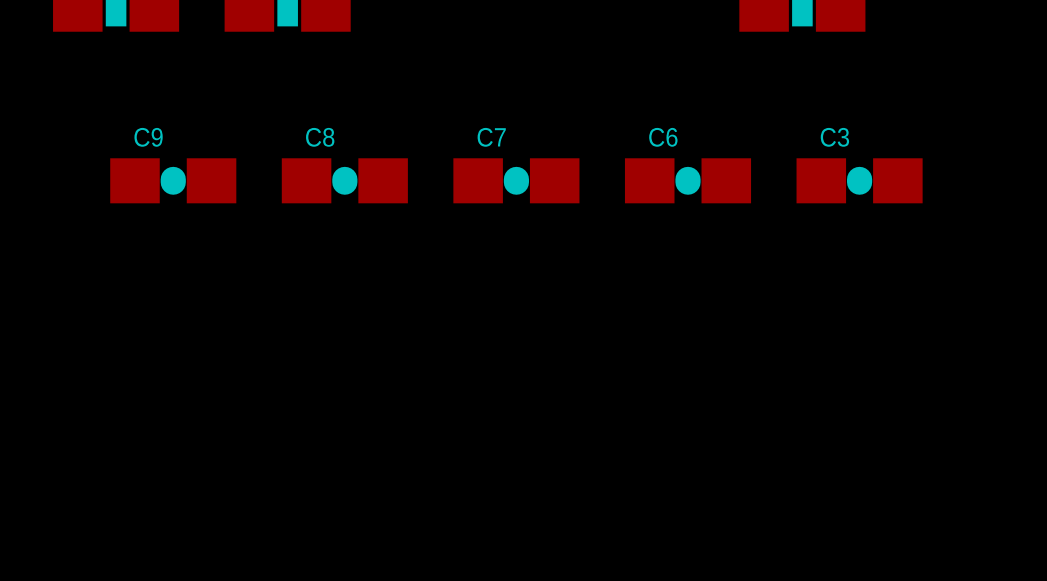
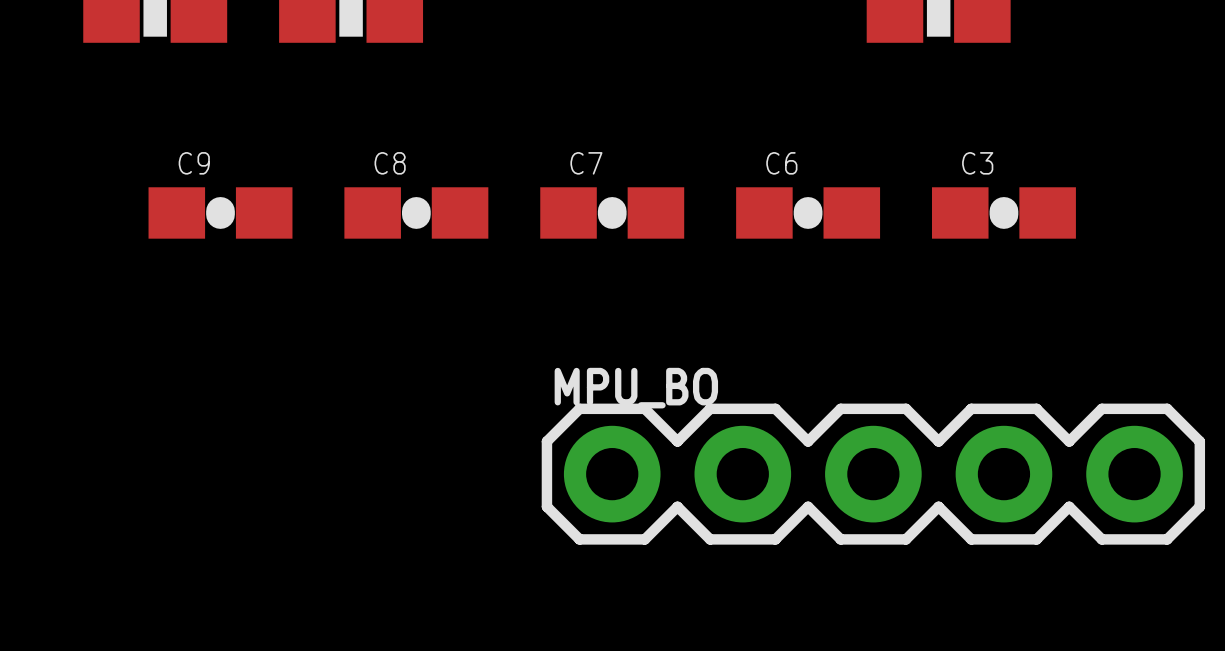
MPU_BO: none -> (873, 474)

